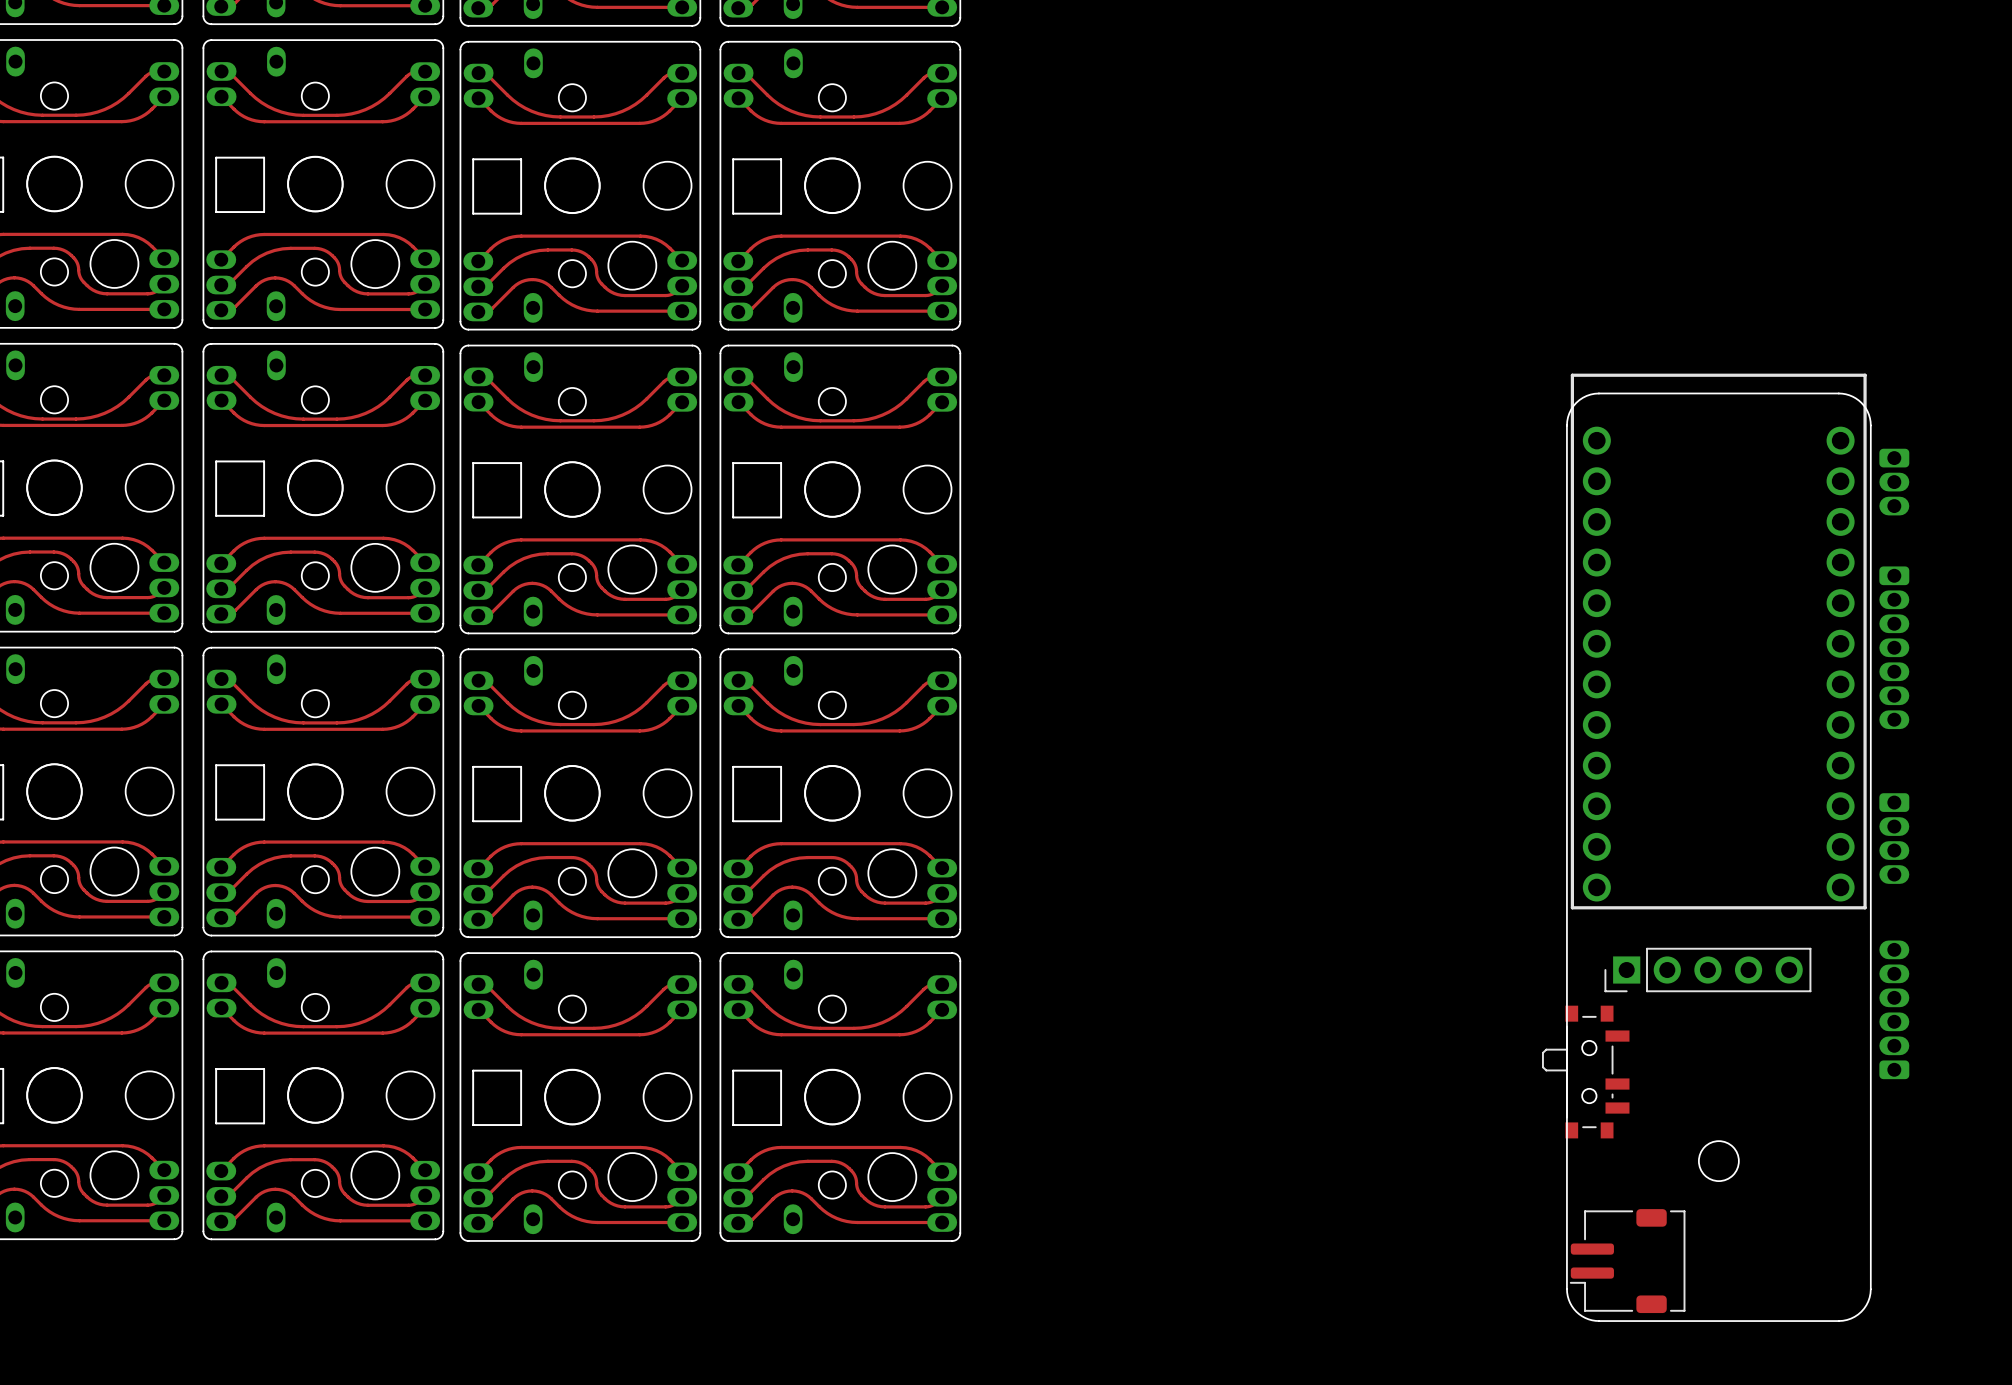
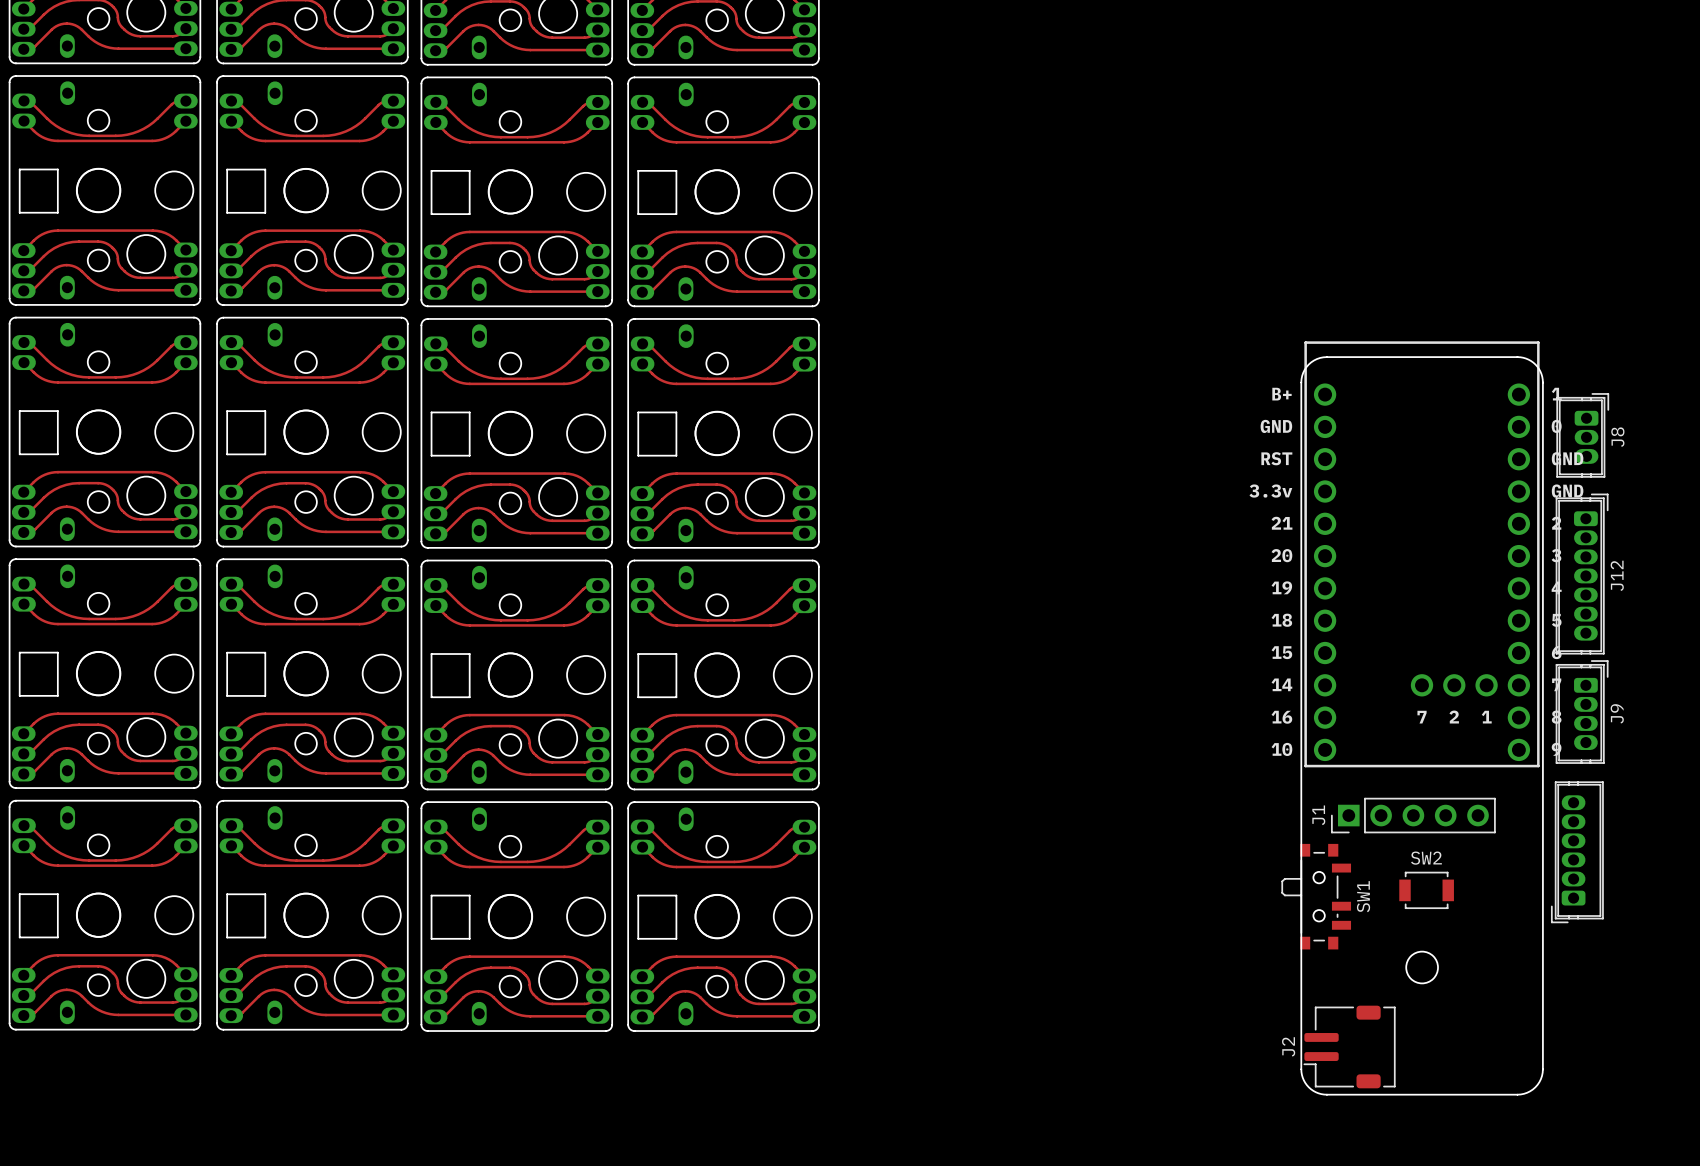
part footprint: [1570, 373, 1867, 910] -> [1304, 341, 1540, 768]
part: (1894, 482) -> none
J8: none -> (1582, 435)
part: (1894, 647) -> none
J12: none -> (1582, 574)
part: (1894, 838) -> none
J9: none -> (1582, 712)
J1 name: none -> J1 (1318, 815)
part: (1894, 1009) -> none
part: none -> (1577, 852)
SW2: none -> (1426, 890)
SW1 name: none -> SW1 (1363, 896)
J2 name: none -> J2 (1288, 1046)

